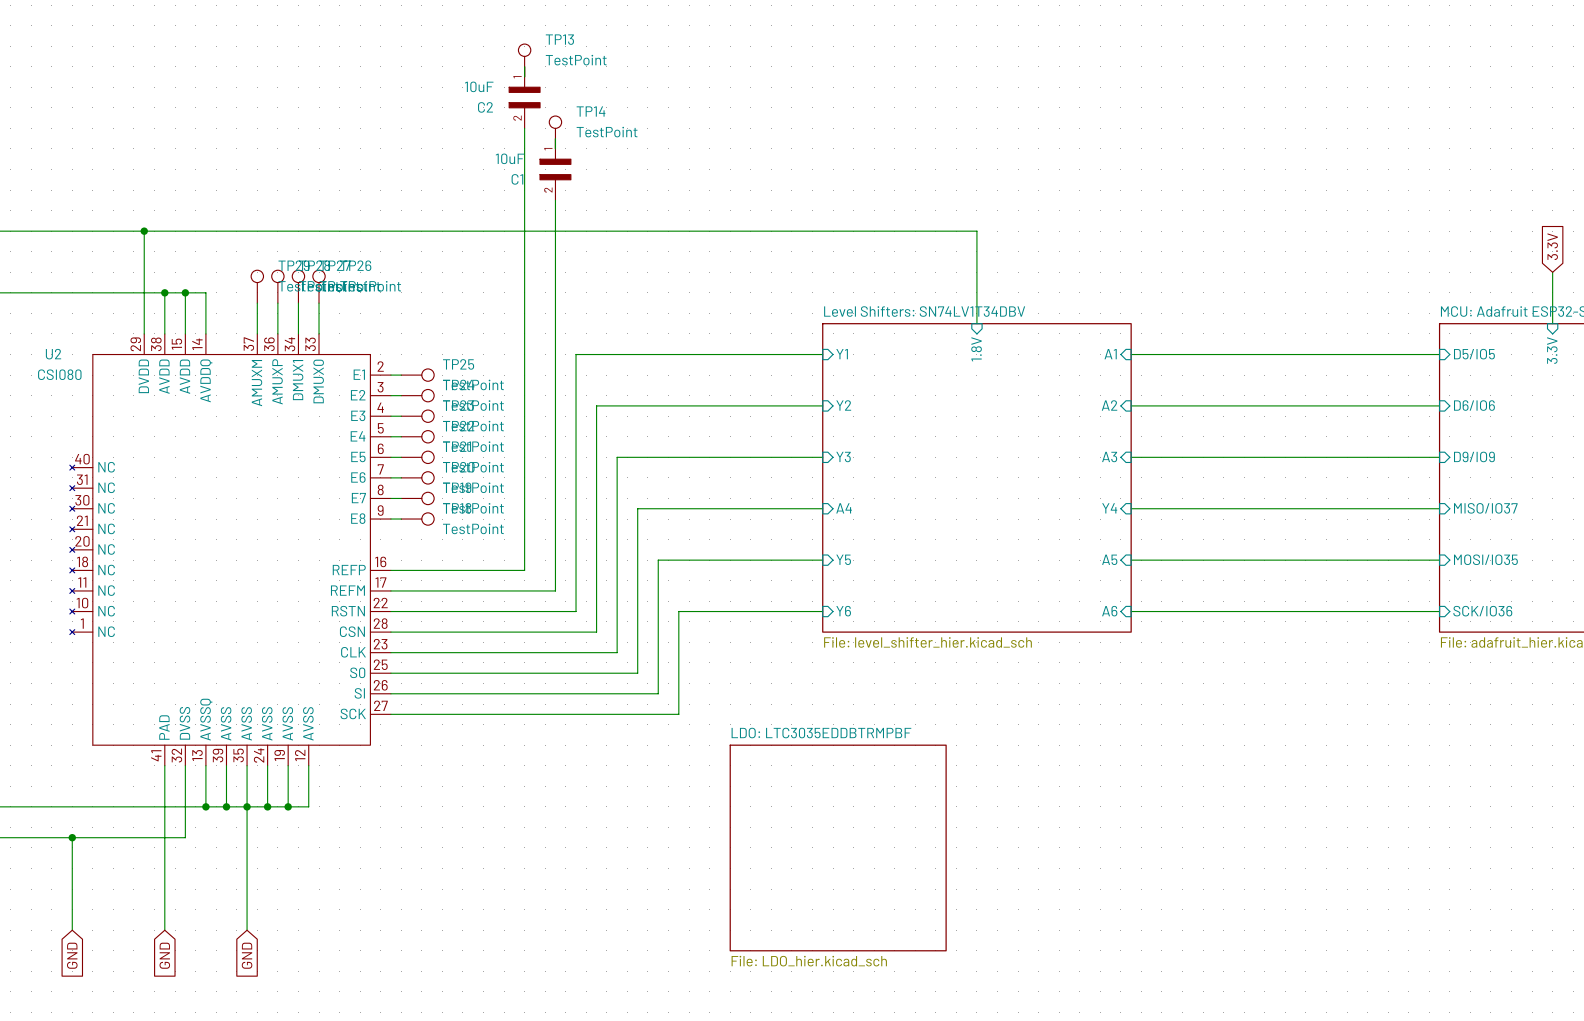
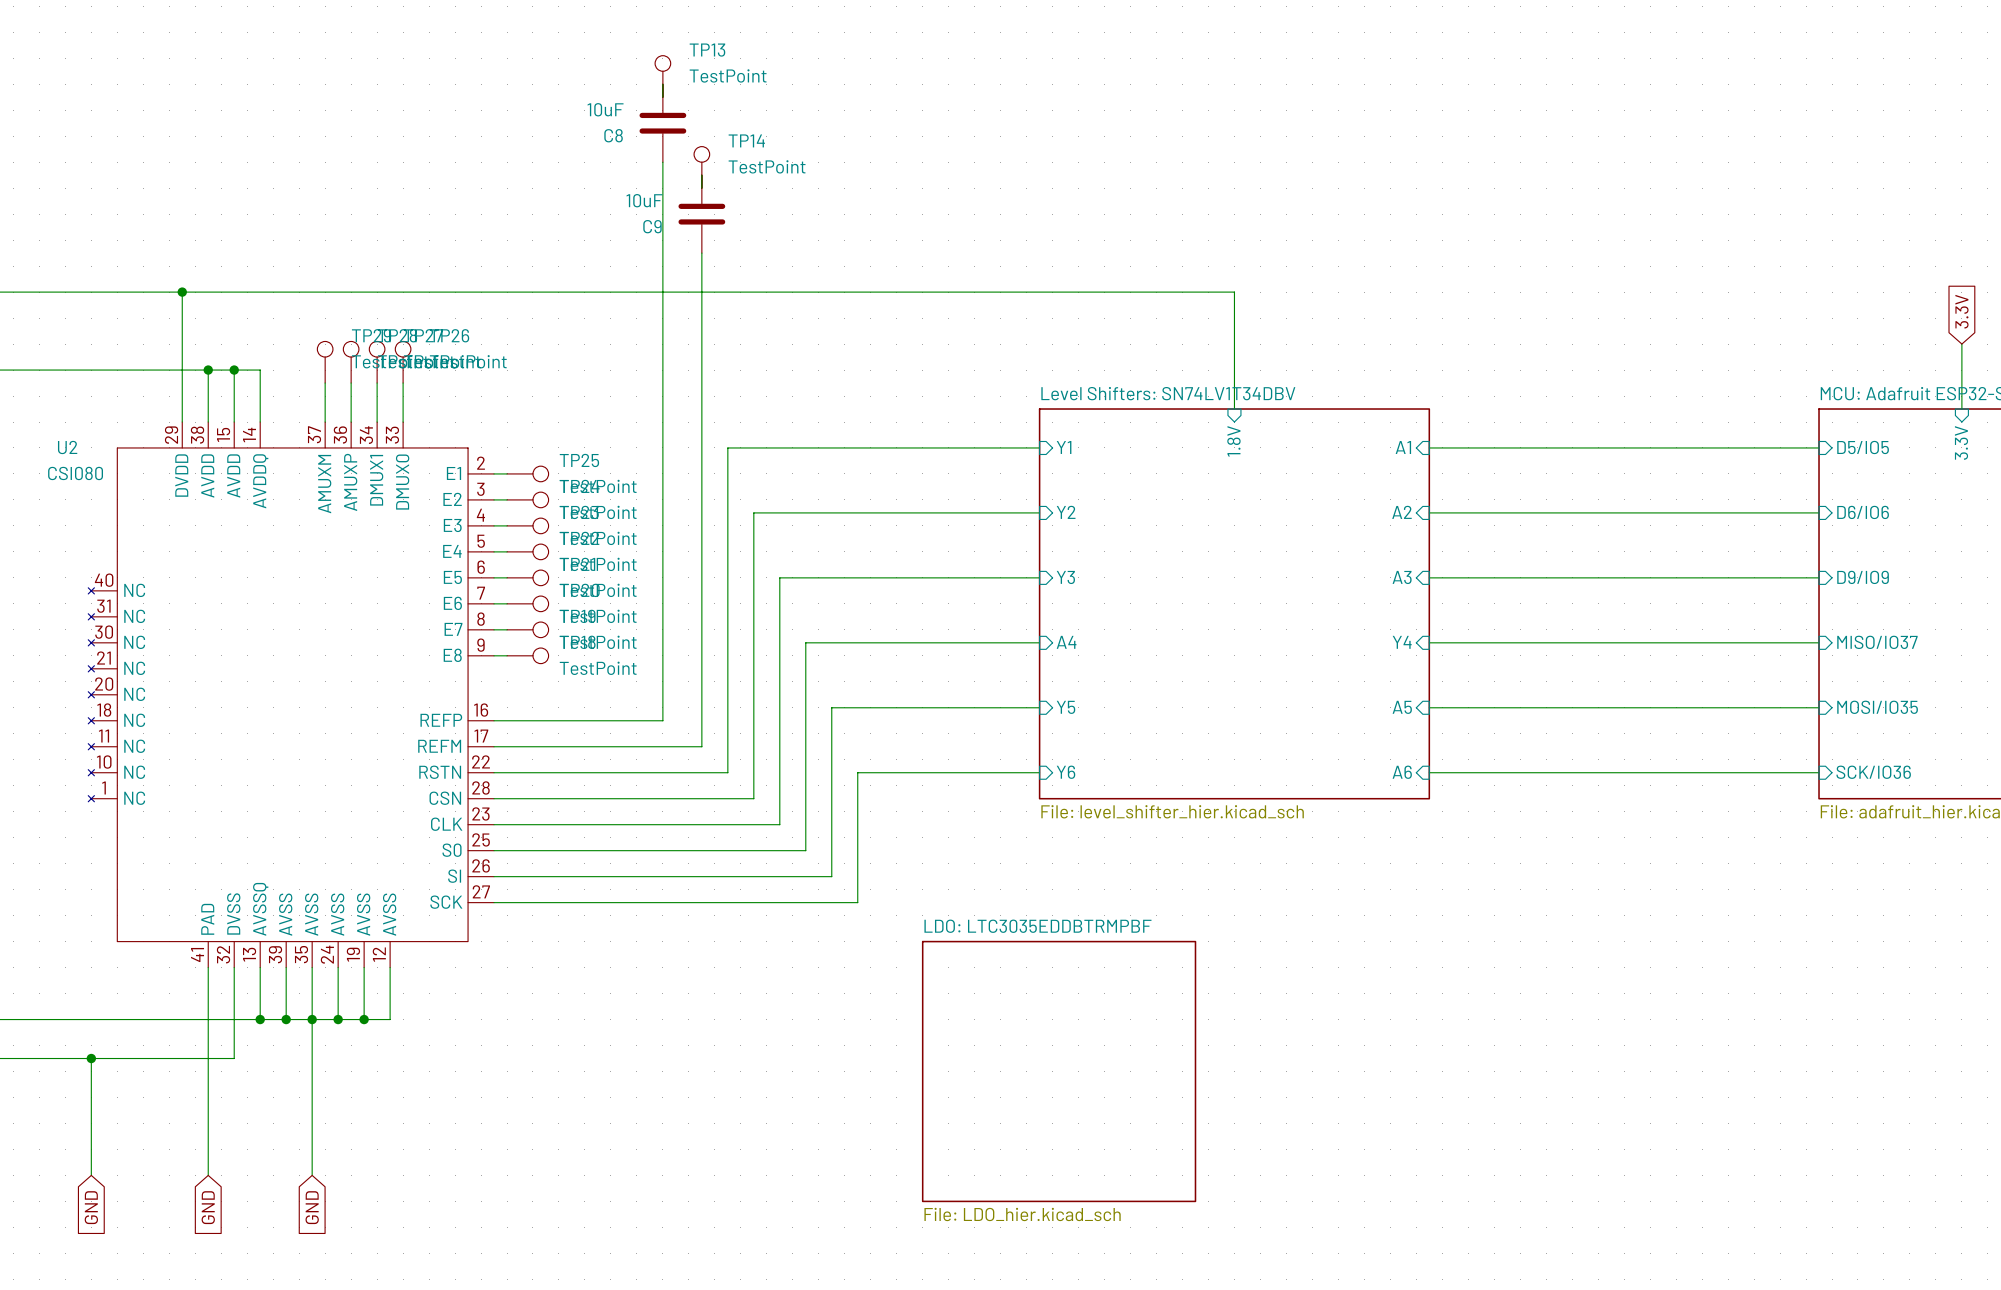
C2: 10uF (524, 97) -> none
C8: none -> 10uF (662, 123)
C1: 10uF (555, 169) -> none
C9: none -> 10uF (701, 214)

